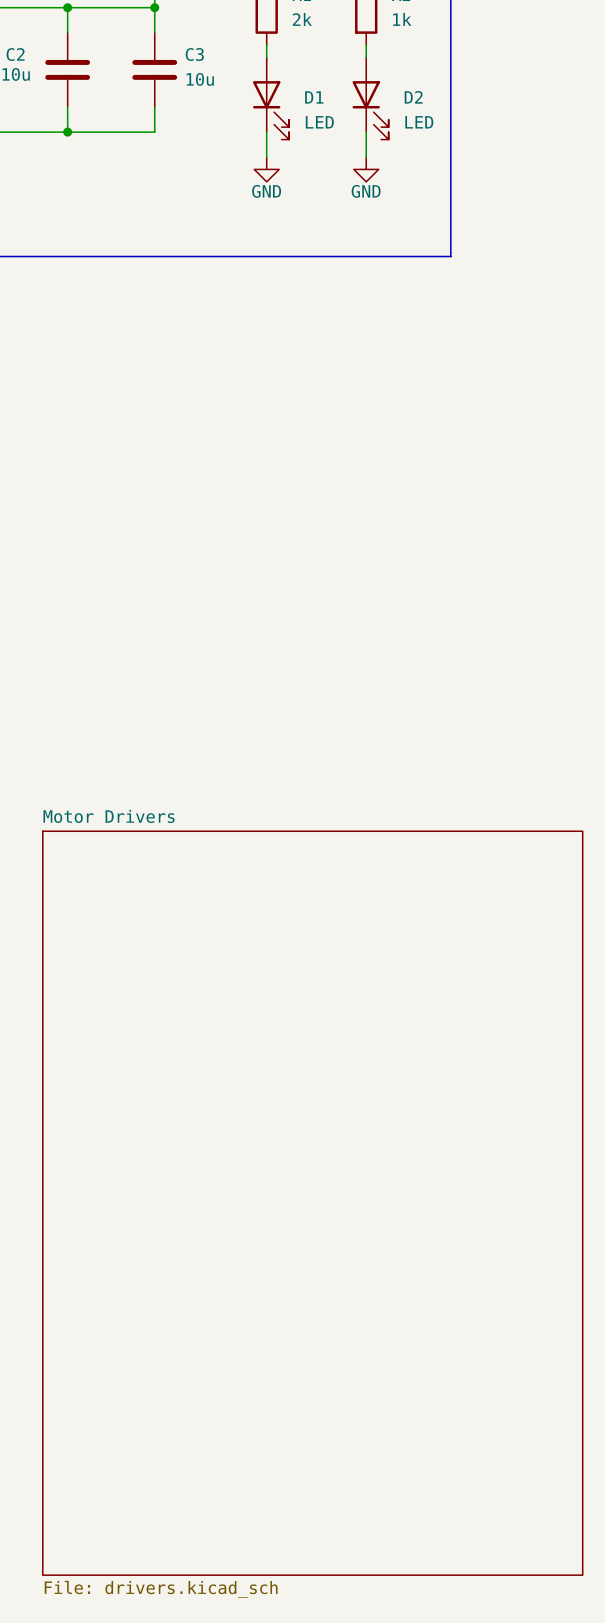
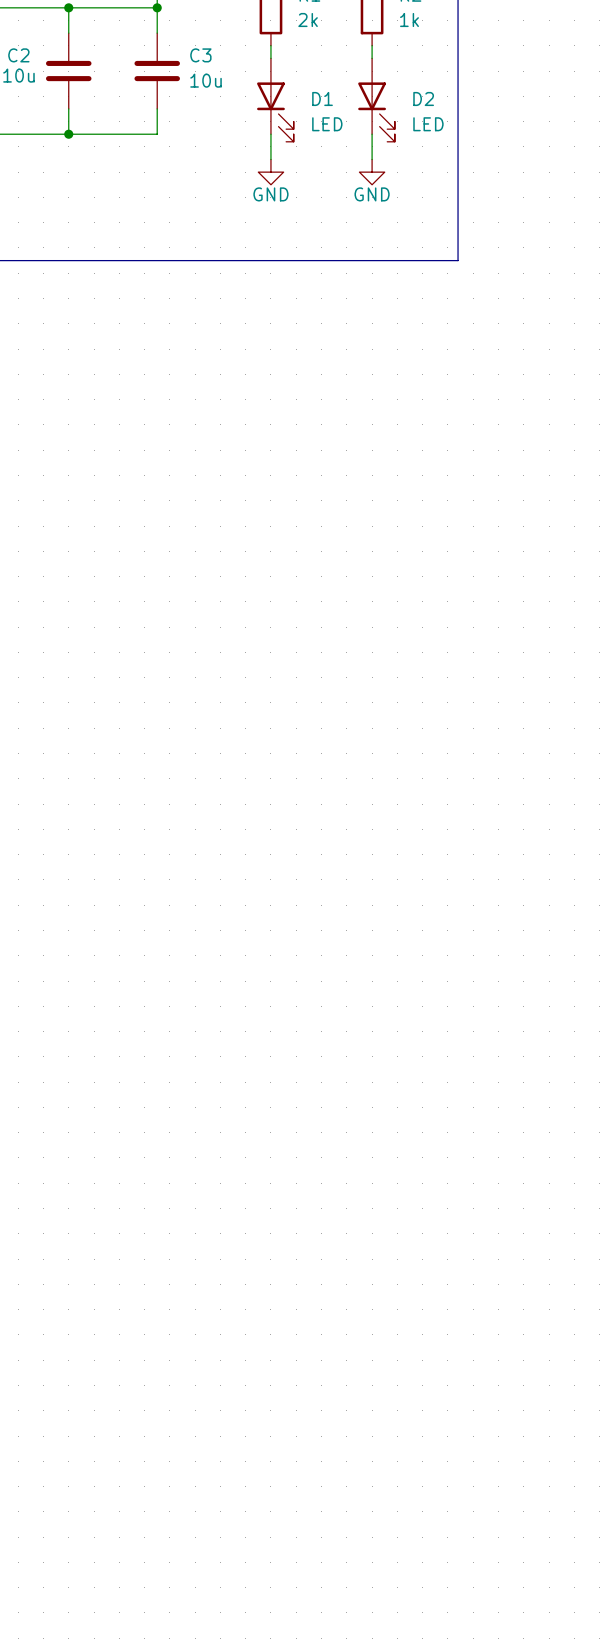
sheet Motor Drivers: File: drivers.kicad_sch (312, 1203) -> none

